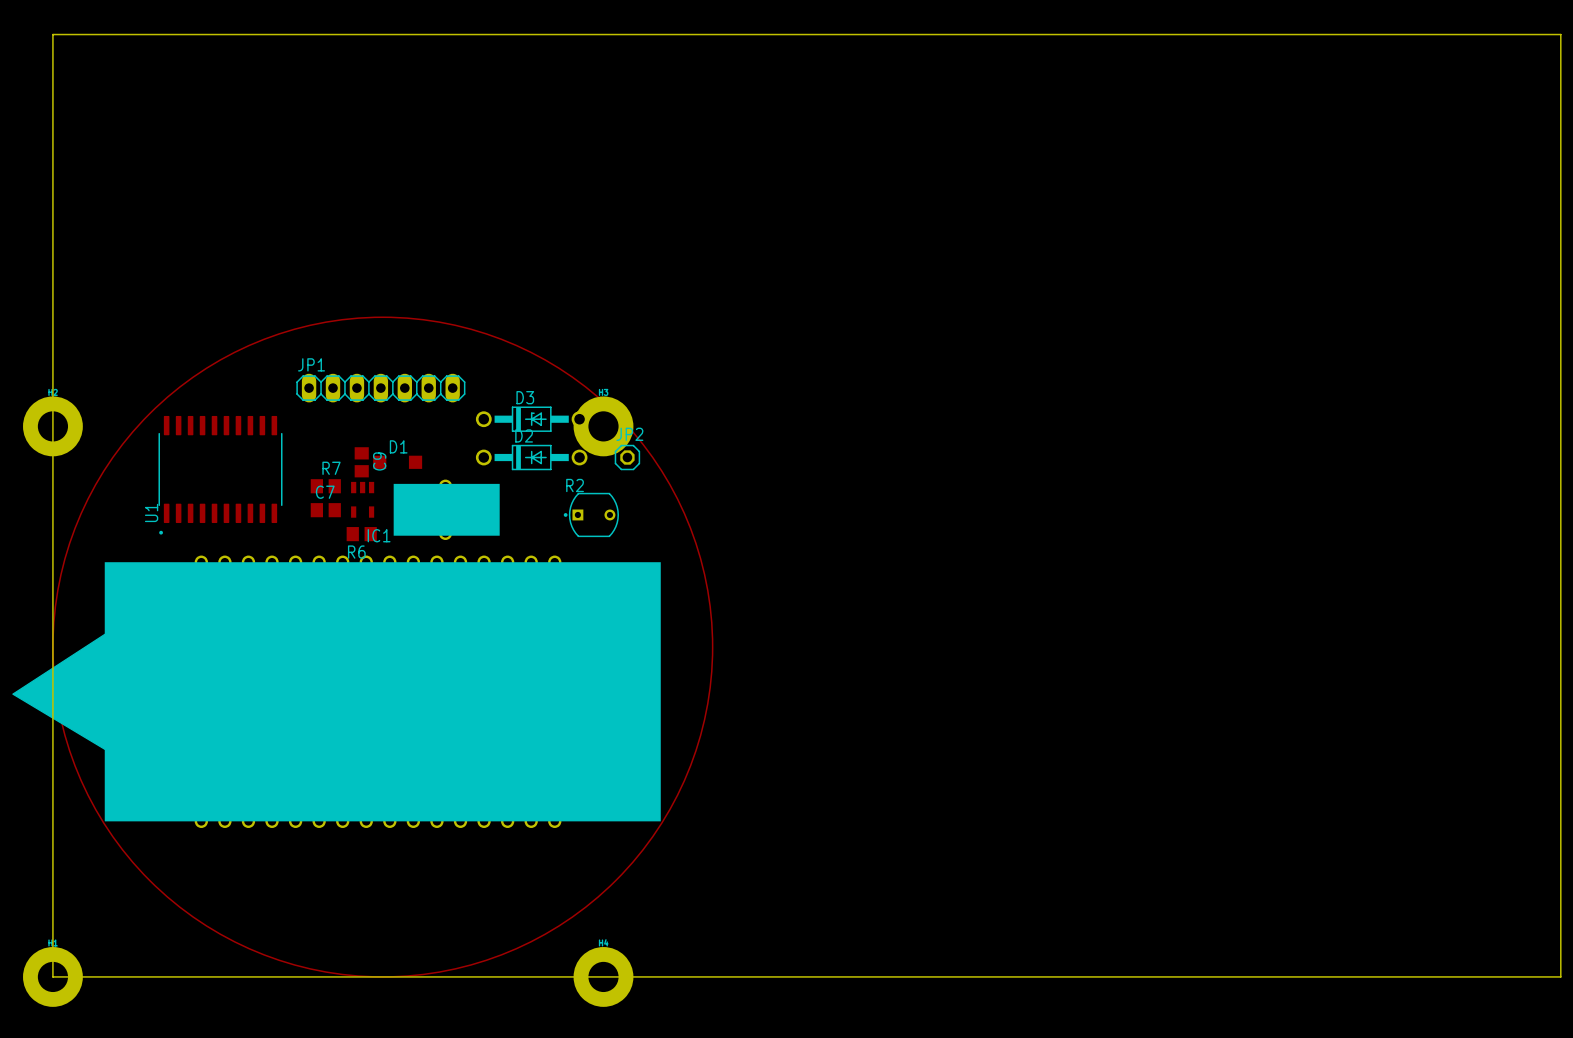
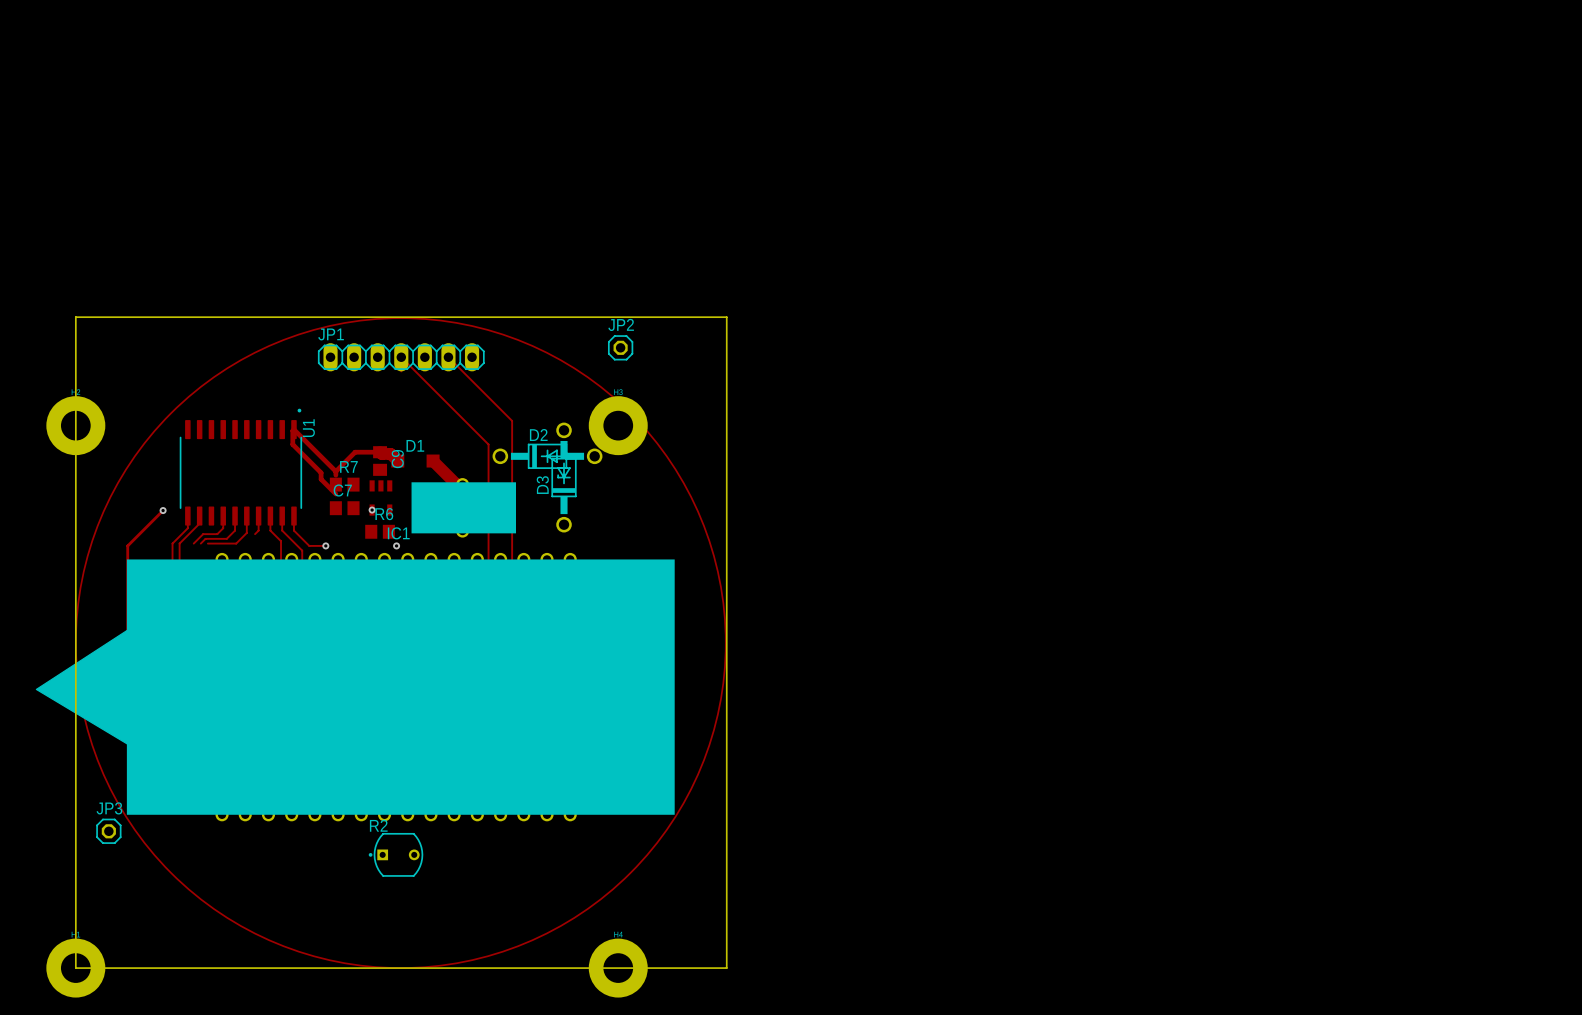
board edge: (52, 316) (52, 34) (1560, 34) (1560, 976) (713, 976) -> (75, 317) (726, 317) (726, 968)
track: none -> (448, 357) (512, 420) (512, 715)
track: none -> (401, 371) (401, 357) (488, 444) (488, 576)
JP1 position: (380, 388) -> (401, 357)
D3 rotation: 0° (531, 419) -> 90° counterclockwise (564, 477)
JP2 position: (627, 457) -> (620, 347)
track: none -> (397, 461) (390, 453) (355, 452) (335, 471)
track: none -> (433, 461) (456, 484) (462, 484)
track: none -> (335, 471) (293, 429) (292, 430) (292, 444) (321, 472) (321, 479) (335, 494)
track: none -> (335, 471) (335, 475)
U1 rotation: 0° (220, 475) -> 180° (240, 467)
track: none -> (163, 510) (127, 545) (127, 644)
via: none -> (163, 510)
via: none -> (372, 510)
R2 position: (591, 514) -> (395, 854)
track: none -> (187, 516) (187, 528) (172, 543) (172, 593)
track: none -> (199, 516) (199, 523) (179, 543) (179, 581)
track: none -> (223, 516) (223, 528) (217, 534) (203, 534) (193, 543)
track: none -> (235, 516) (235, 530) (226, 538) (205, 538) (200, 543)
track: none -> (246, 516) (246, 532) (236, 543) (207, 543)
track: none -> (258, 516) (258, 530) (255, 534)
track: none -> (270, 516) (270, 530) (281, 541) (281, 578)
track: none -> (282, 516) (282, 530) (302, 550) (302, 571)
track: none -> (293, 516) (293, 530) (309, 545) (325, 545)
via: none -> (325, 545)
via: none -> (396, 545)
R6 name position: R6 (356, 552) -> R6 (384, 514)
JP3: none -> (108, 831)

